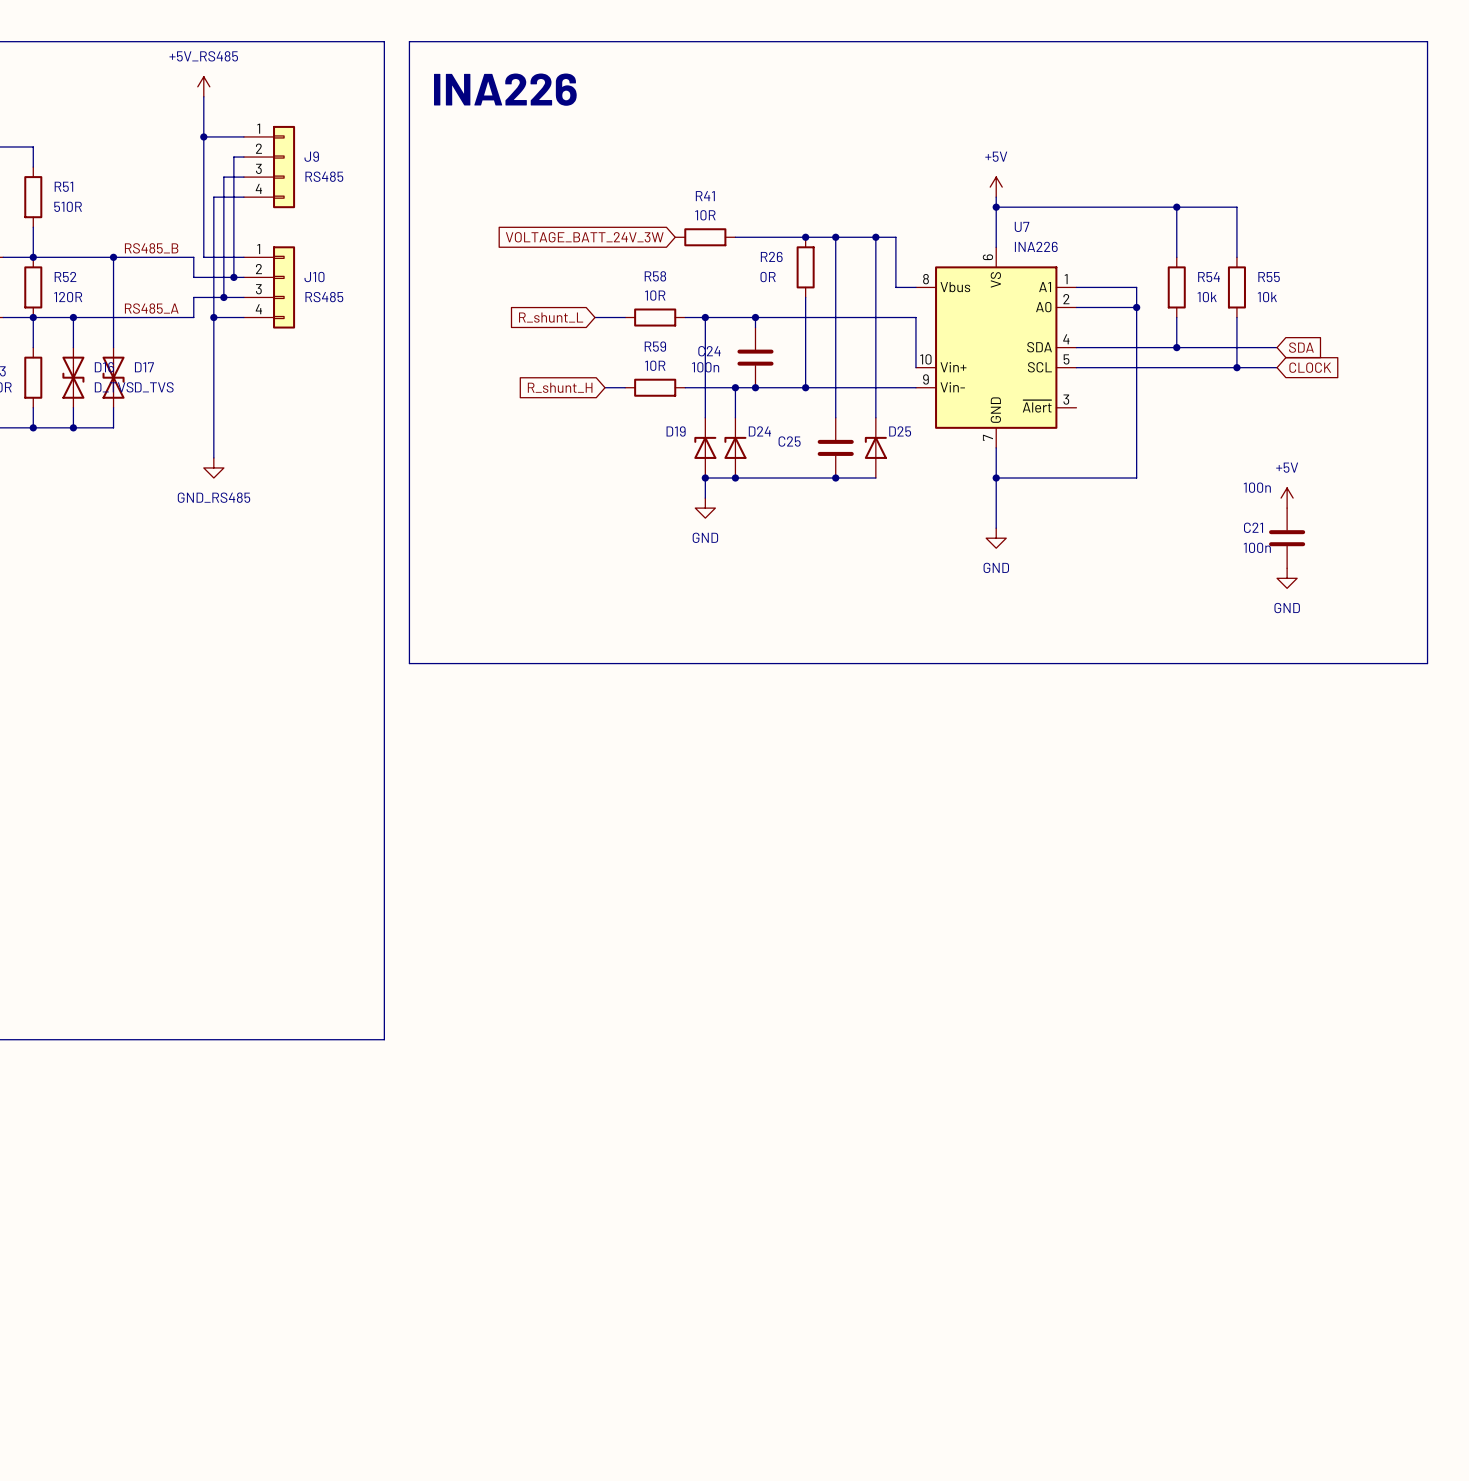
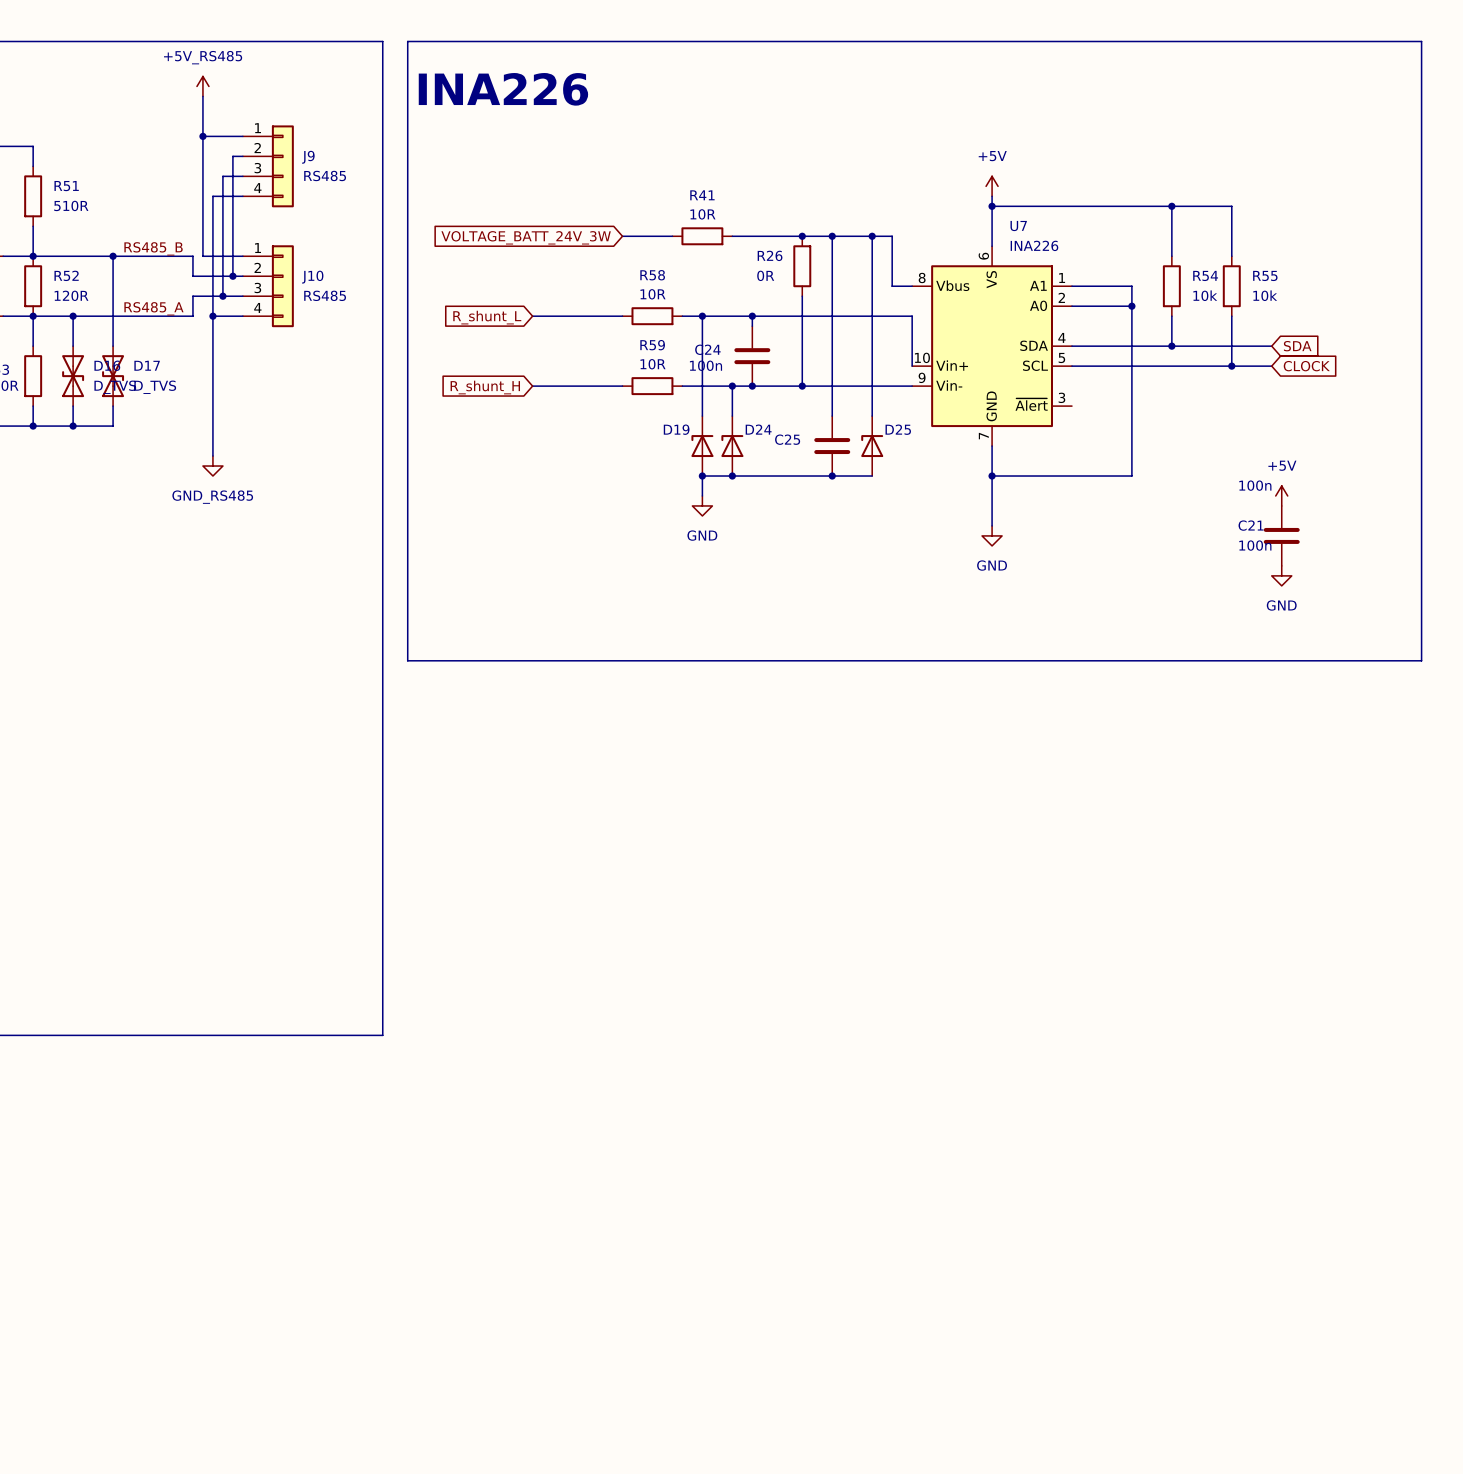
global label position: VOLTAGE_BATT_24V_3W (584, 237) -> VOLTAGE_BATT_24V_3W (526, 237)
wire: none -> (622, 236) (672, 236)
wire: none -> (532, 316) (592, 316)
global label position: R_shunt_L (551, 317) -> R_shunt_L (487, 317)
wire: none -> (532, 386) (602, 386)
global label position: R_shunt_H (560, 387) -> R_shunt_H (485, 387)

